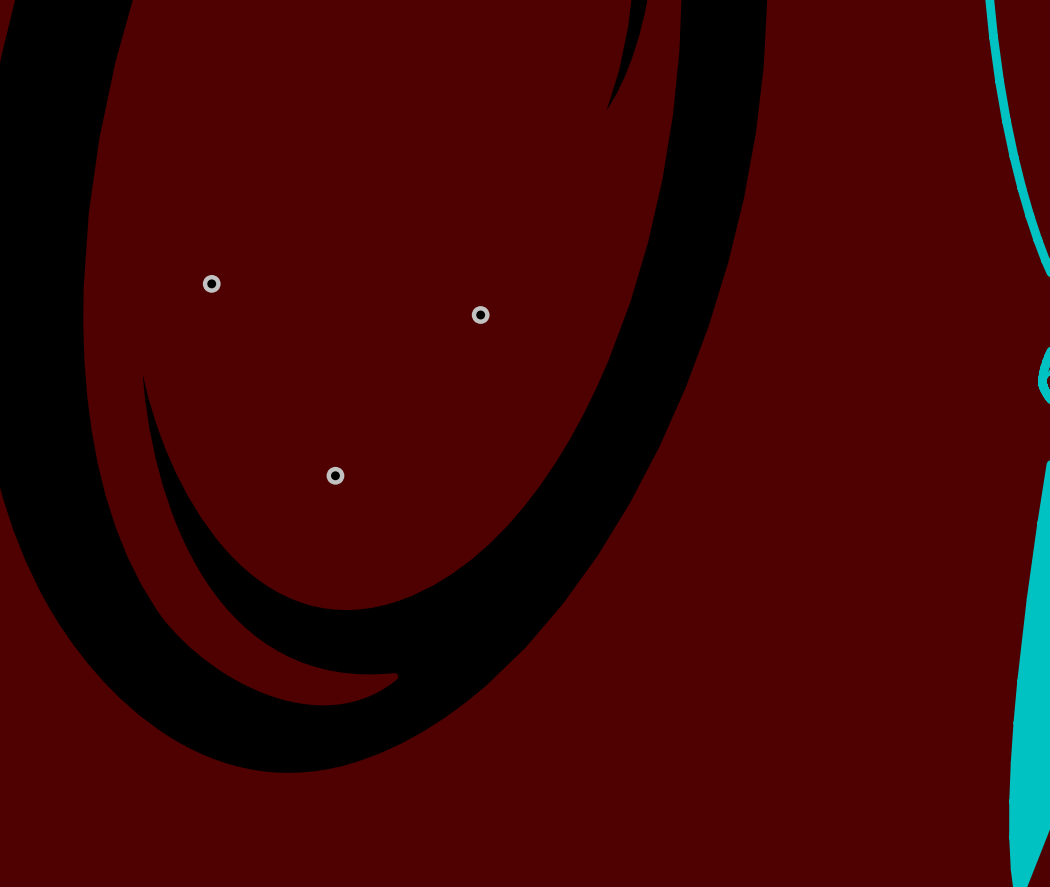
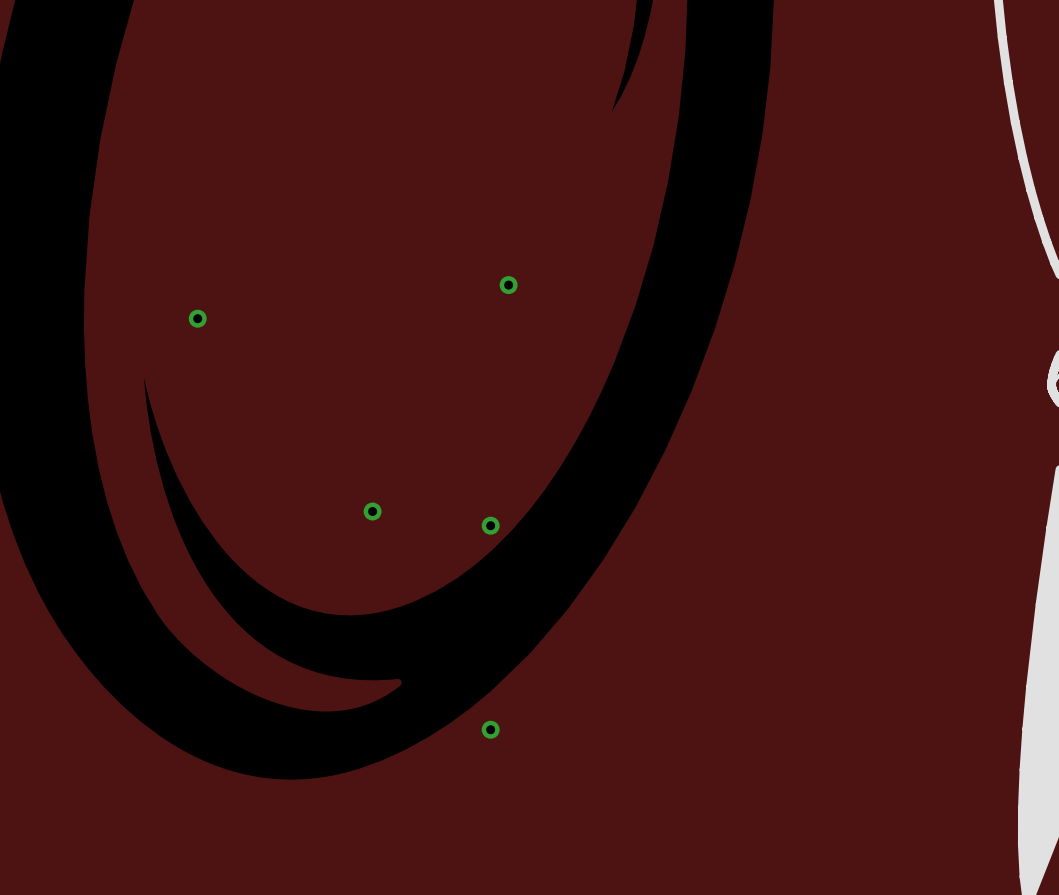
via position: (211, 283) -> (197, 318)
via position: (480, 314) -> (508, 285)
via position: (335, 475) -> (372, 511)
via: none -> (490, 525)
via: none -> (490, 729)

